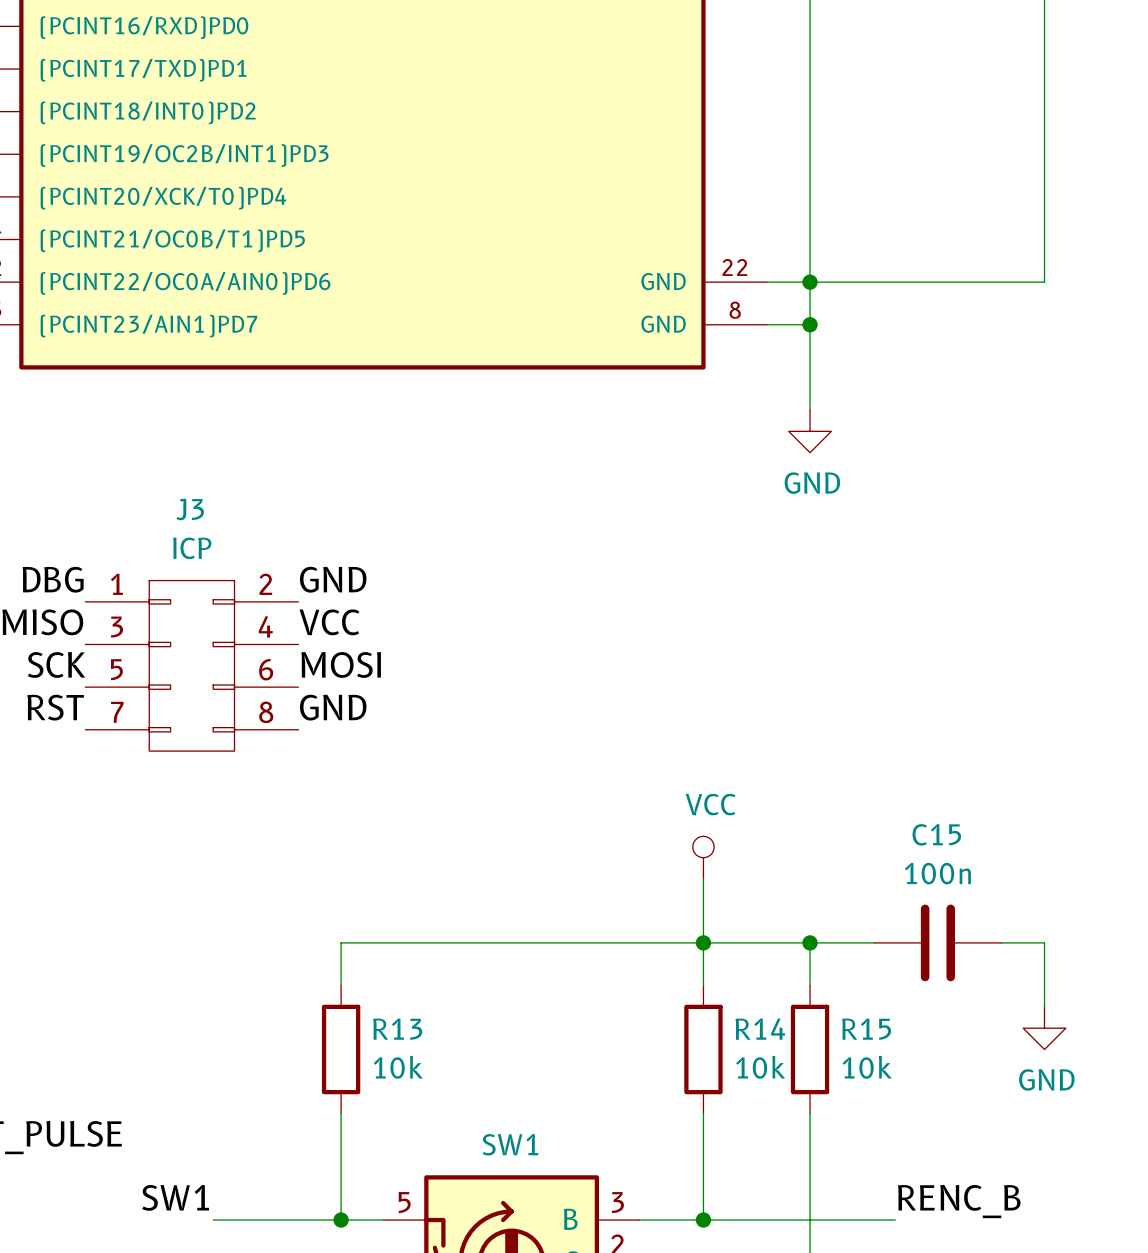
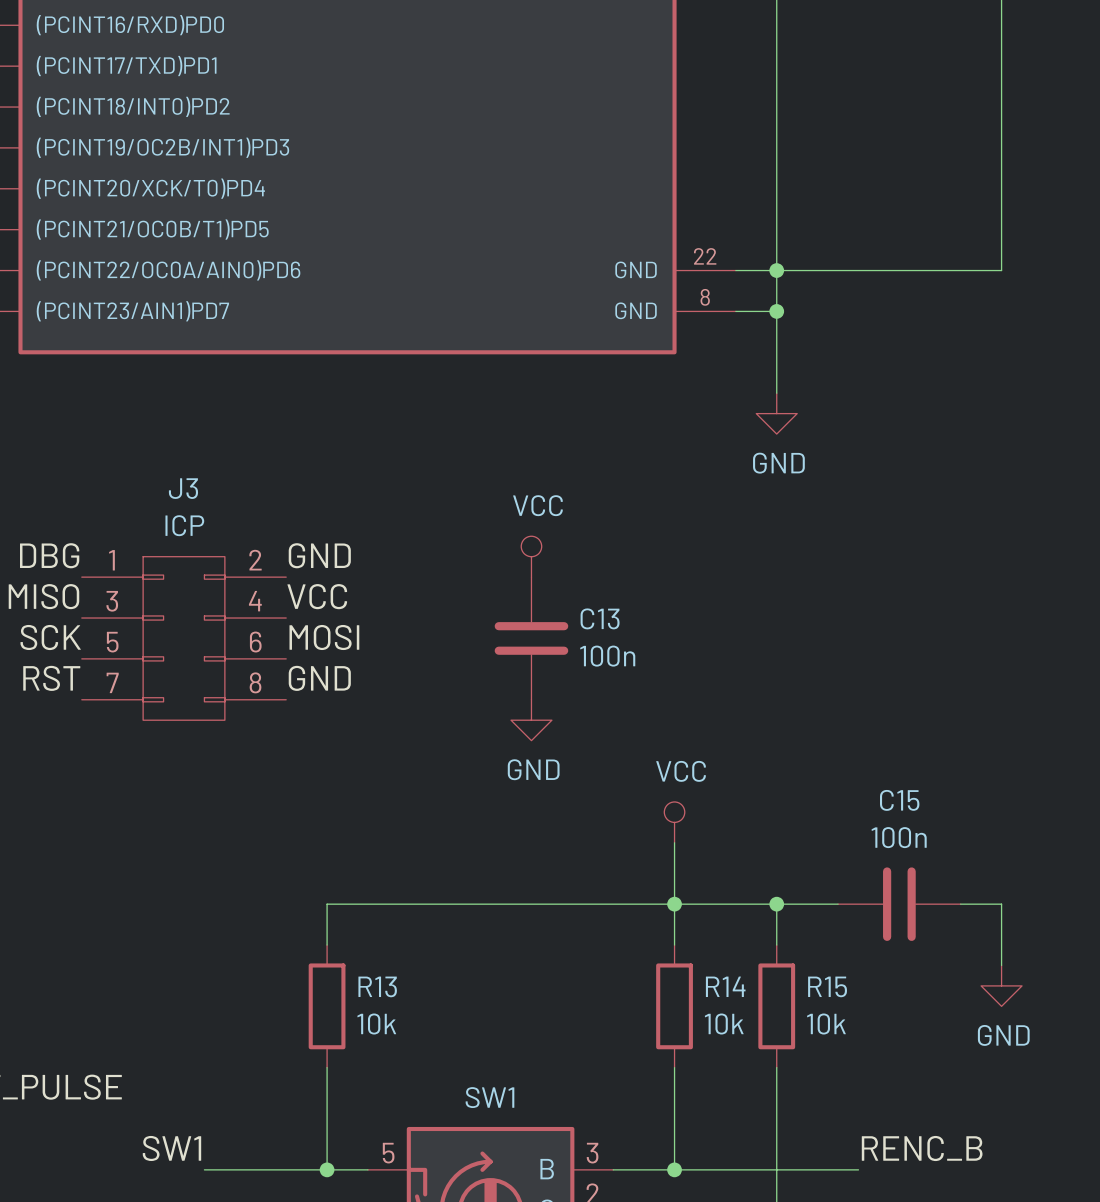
power symbol: none -> VCC (531, 556)
C13: none -> 100n (531, 638)
power symbol: none -> GND (531, 720)

